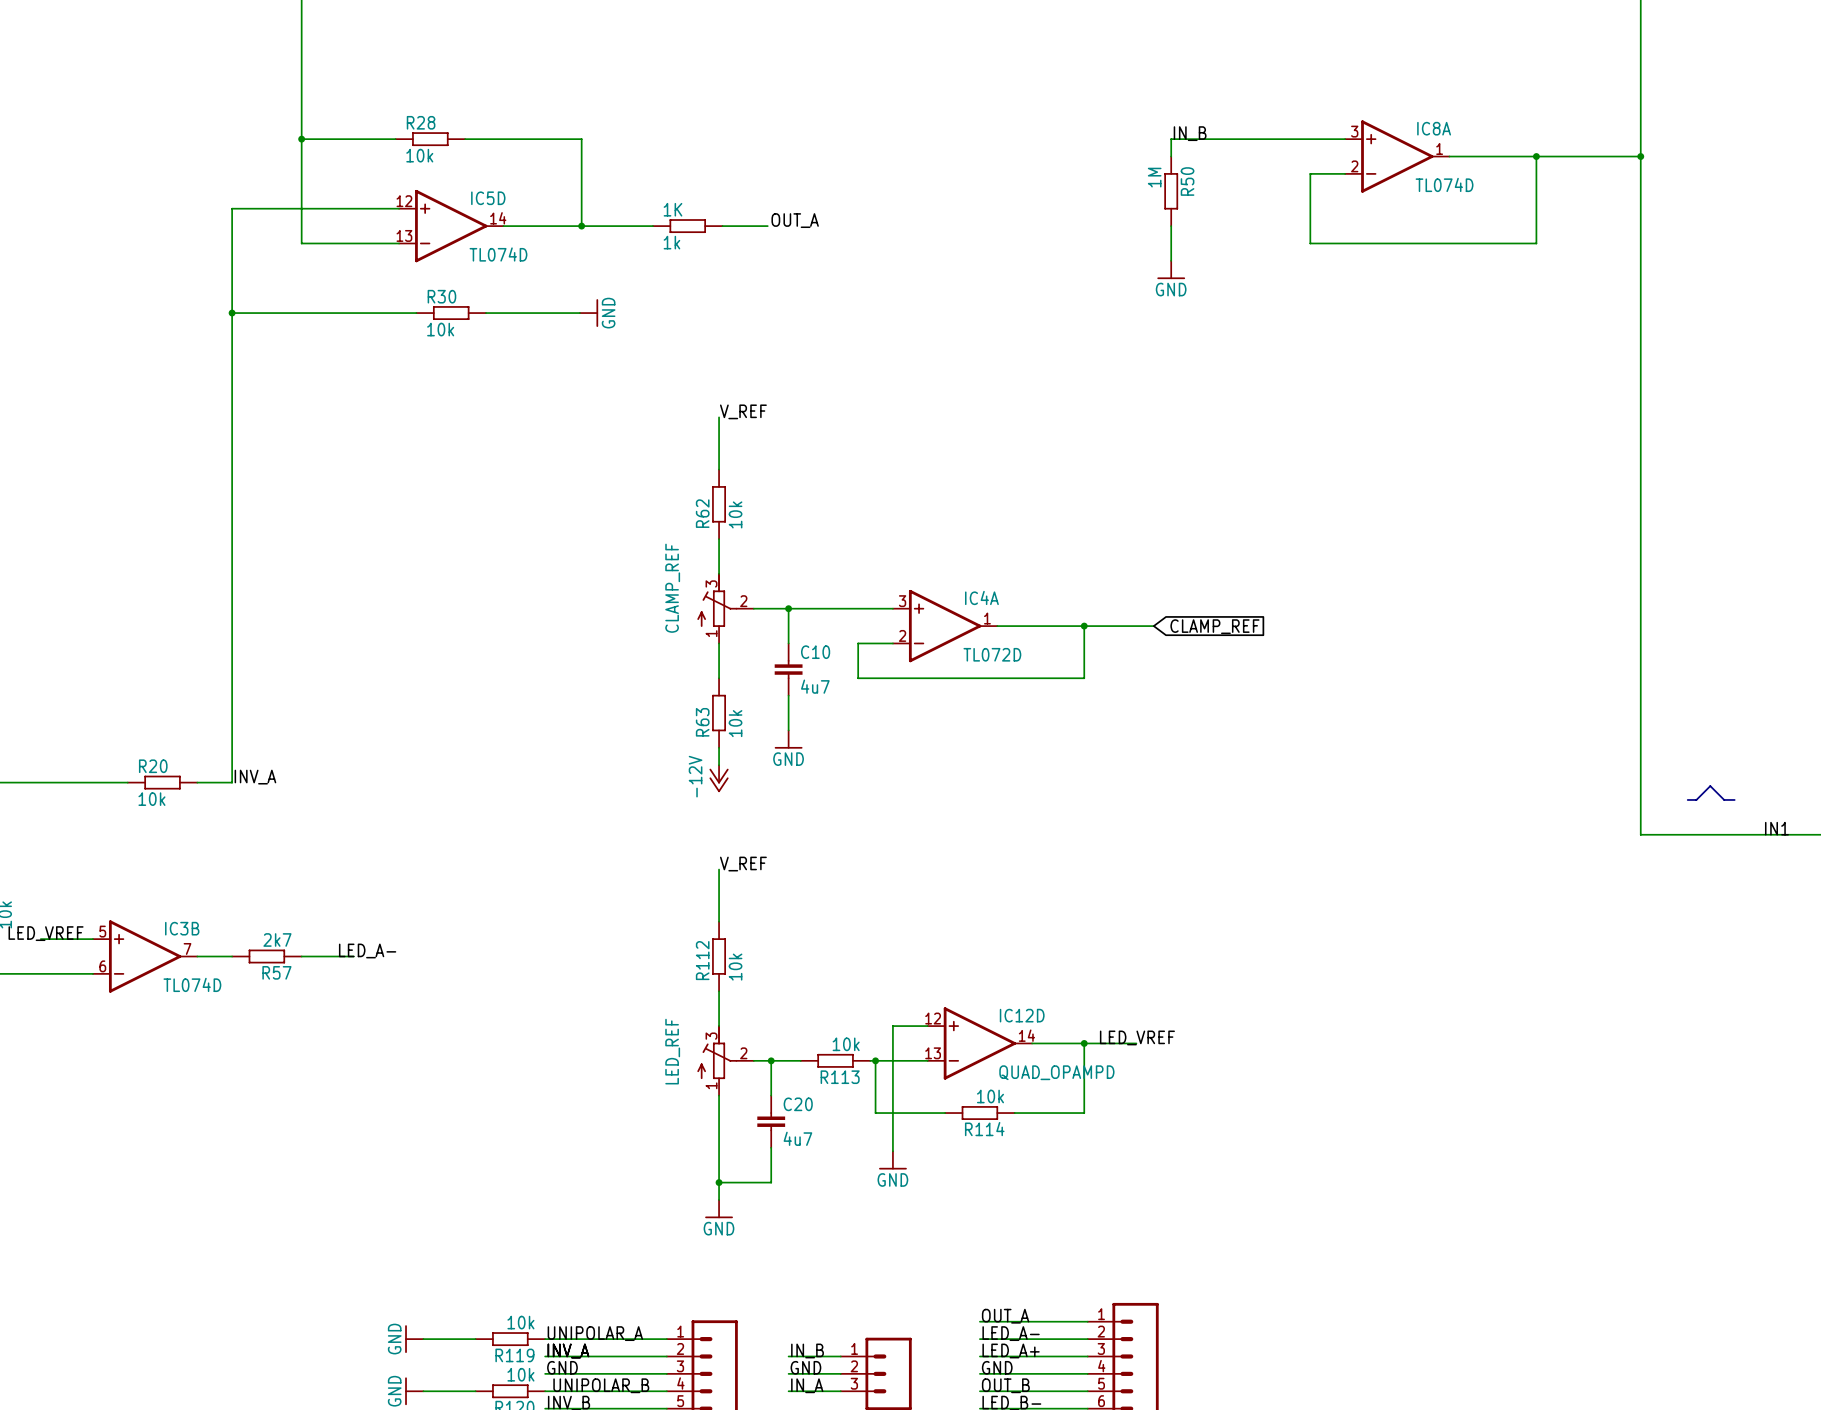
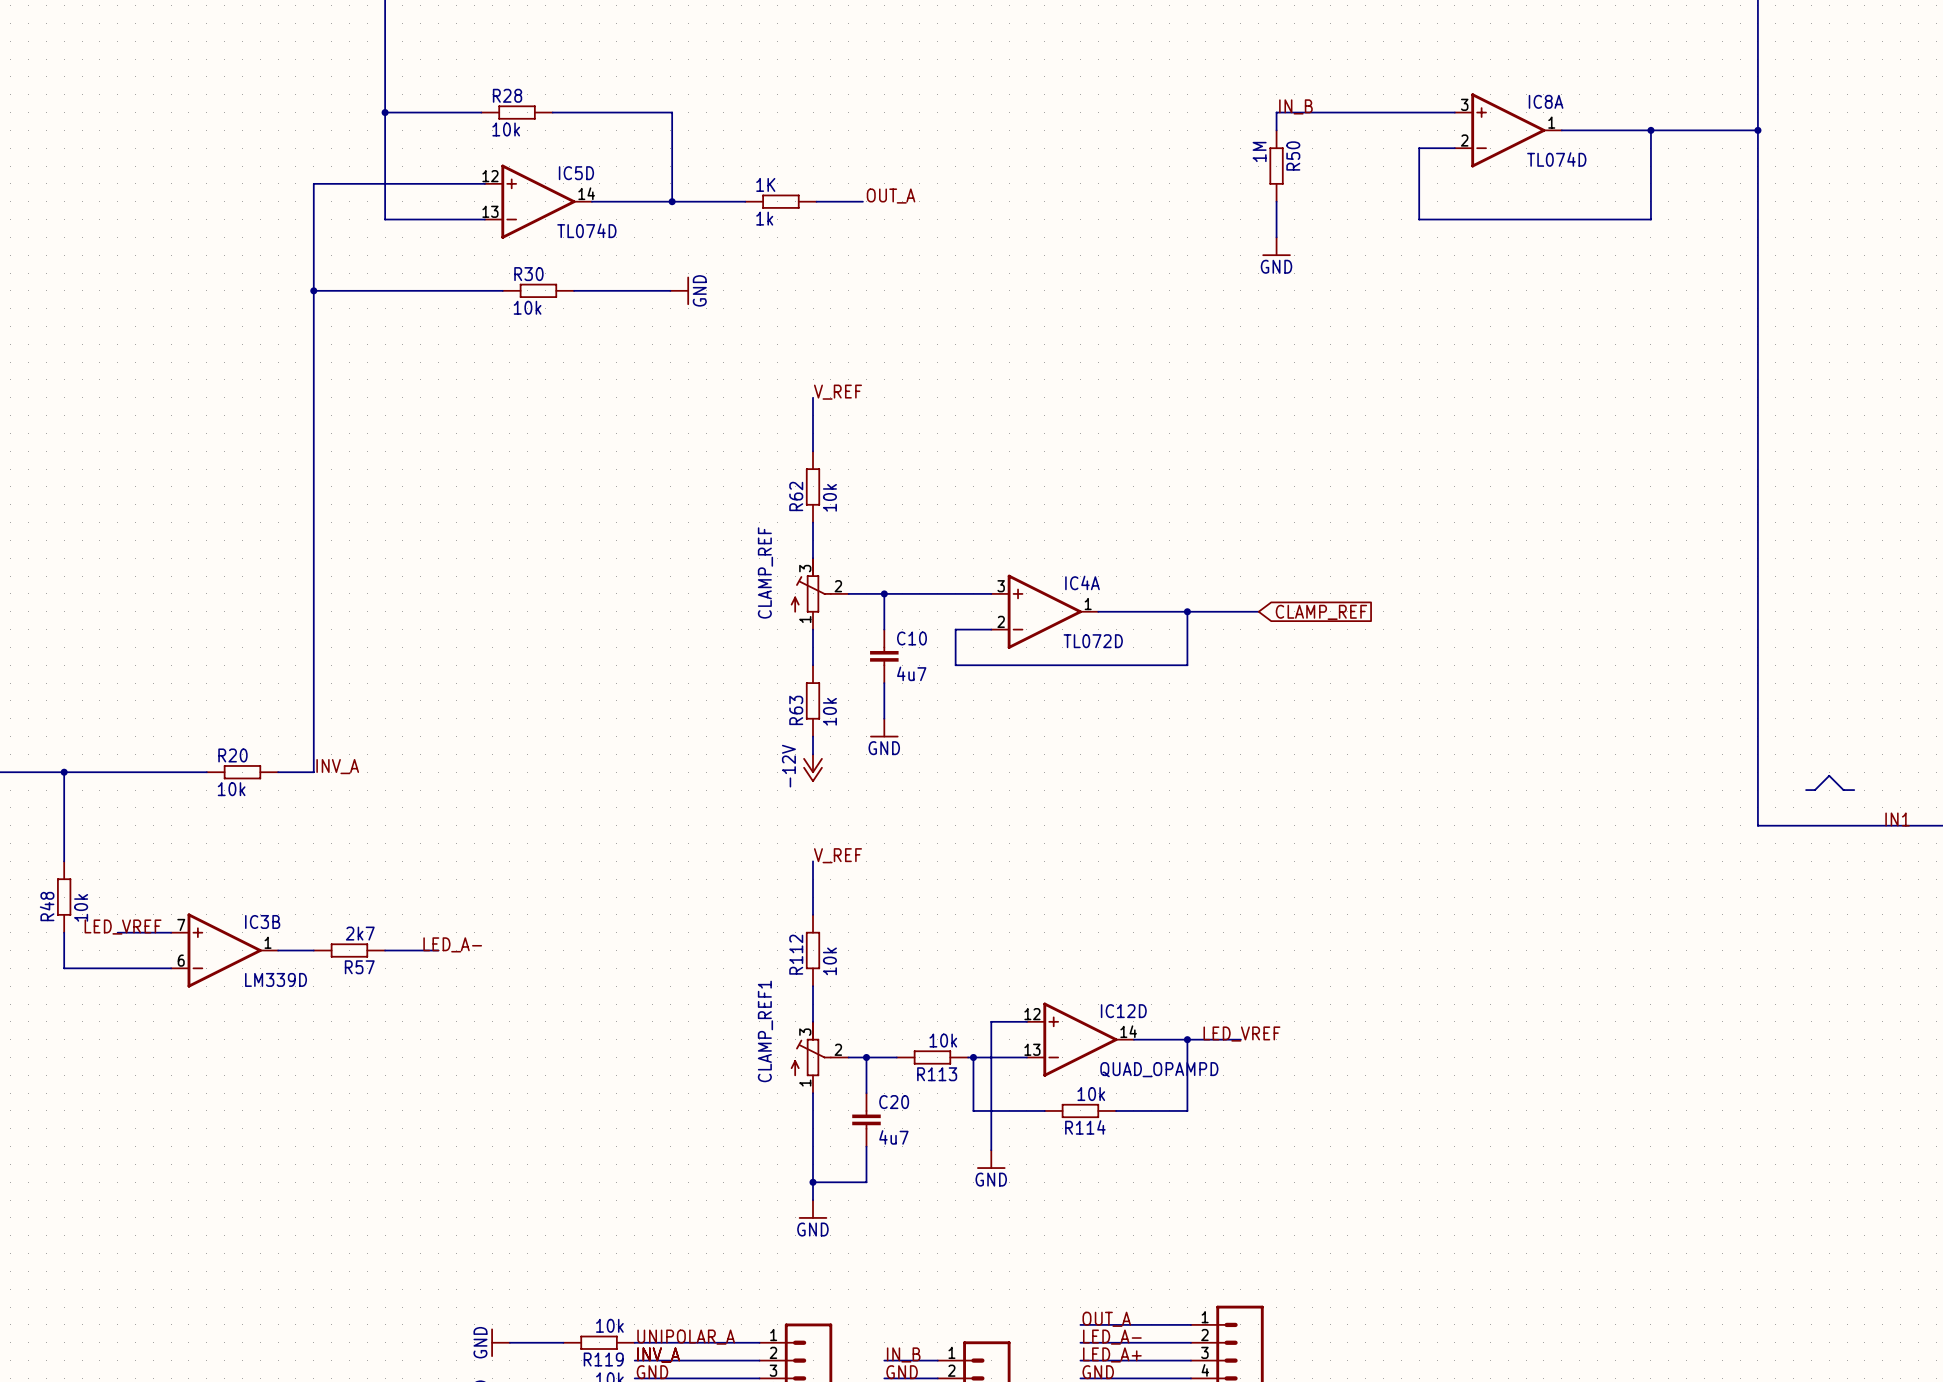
IC3B pin number: 5 (102, 931) -> 7 (181, 924)
IC3B pin number: 7 (187, 948) -> 1 (268, 942)
IC3B value: TL074D (192, 984) -> LM339D (276, 979)
LED_REF name: LED_REF (672, 1051) -> CLAMP_REF1 (765, 1031)

